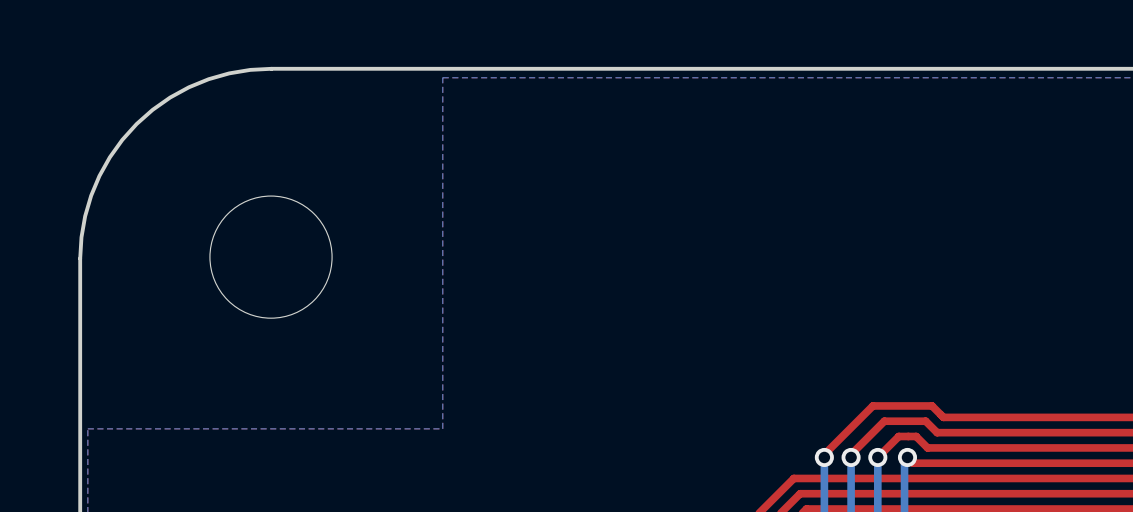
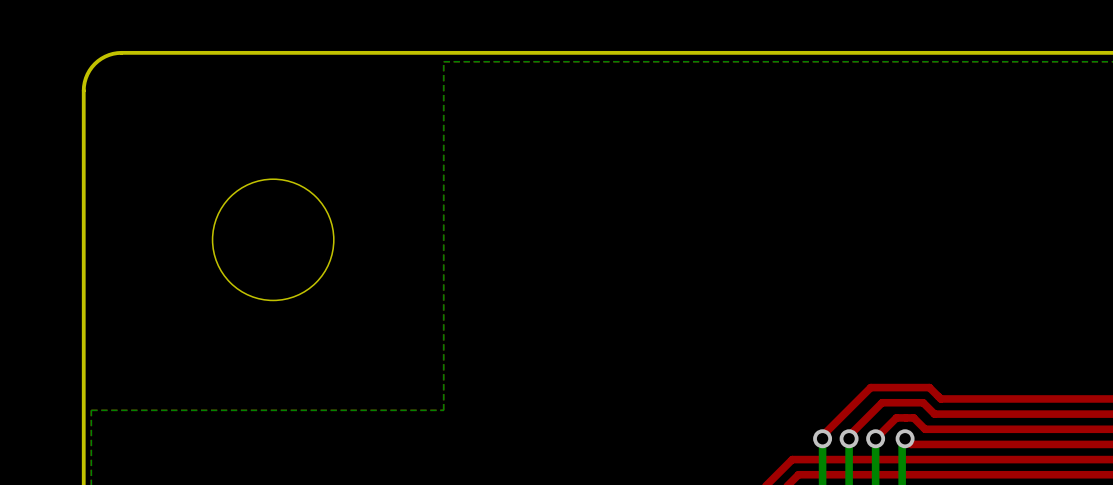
board edge: (271, 68) (229, 73) (208, 79) (170, 97) (136, 124) (109, 157) (91, 195) (85, 216) (80, 258) -> (273, 52) (117, 53) (105, 56) (94, 63) (87, 74) (83, 86) (83, 241)

